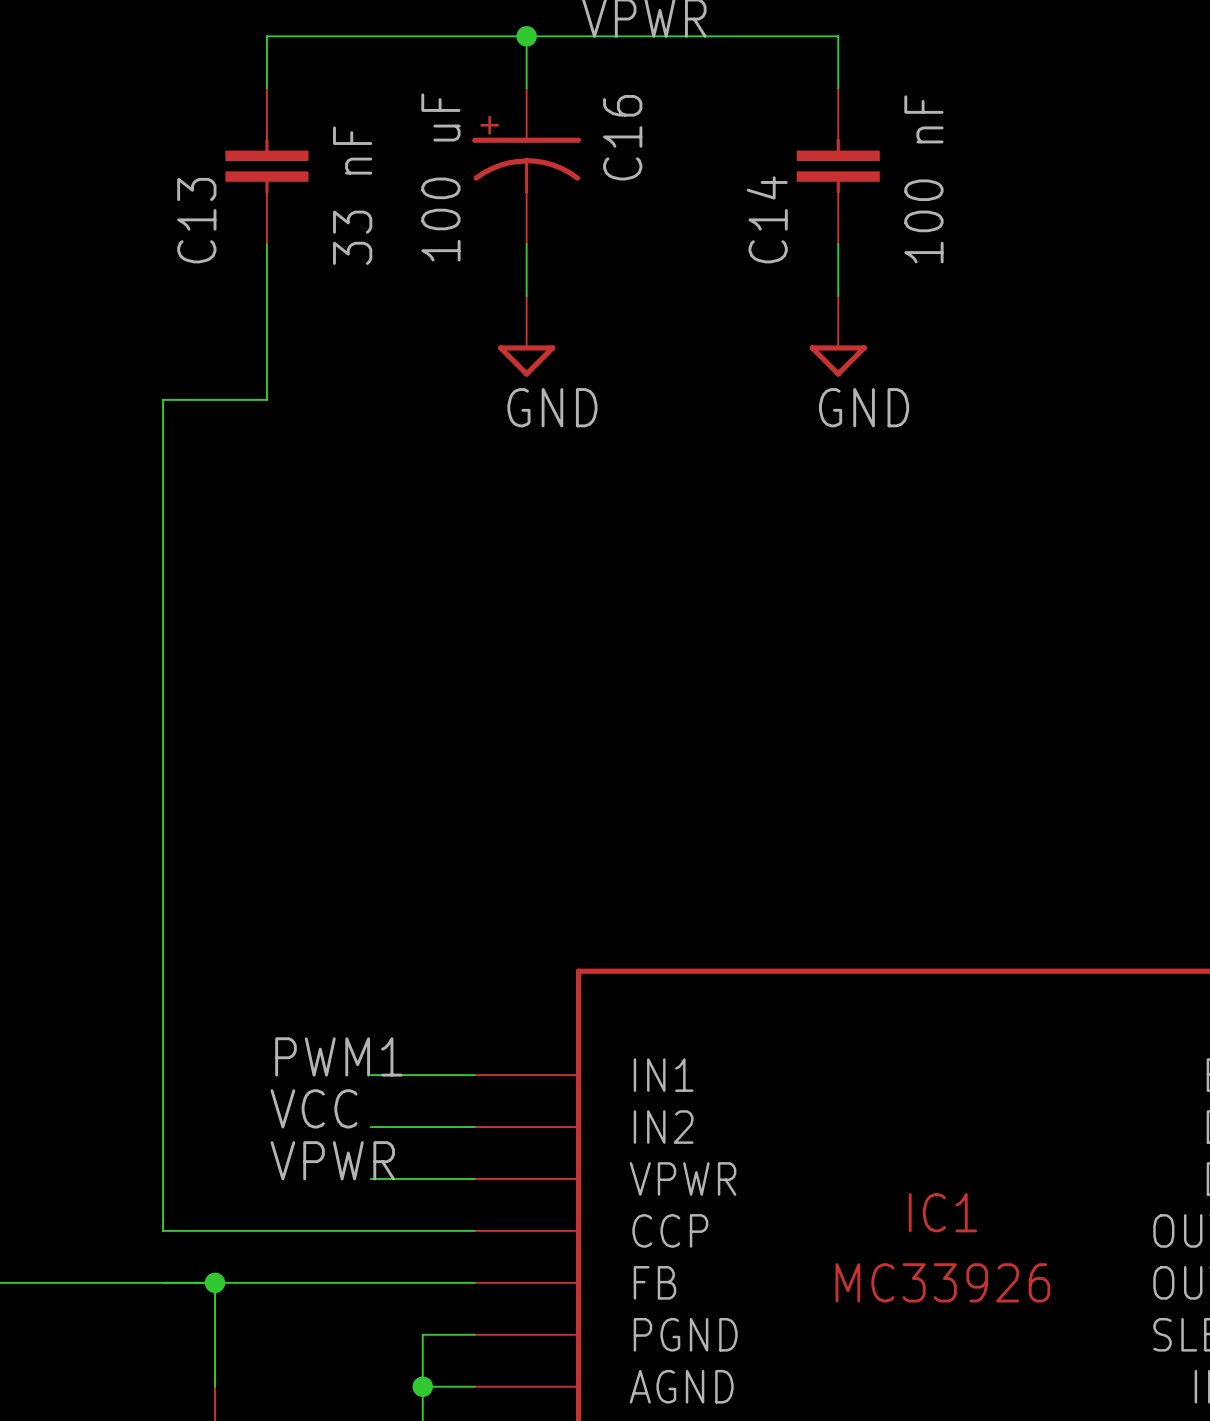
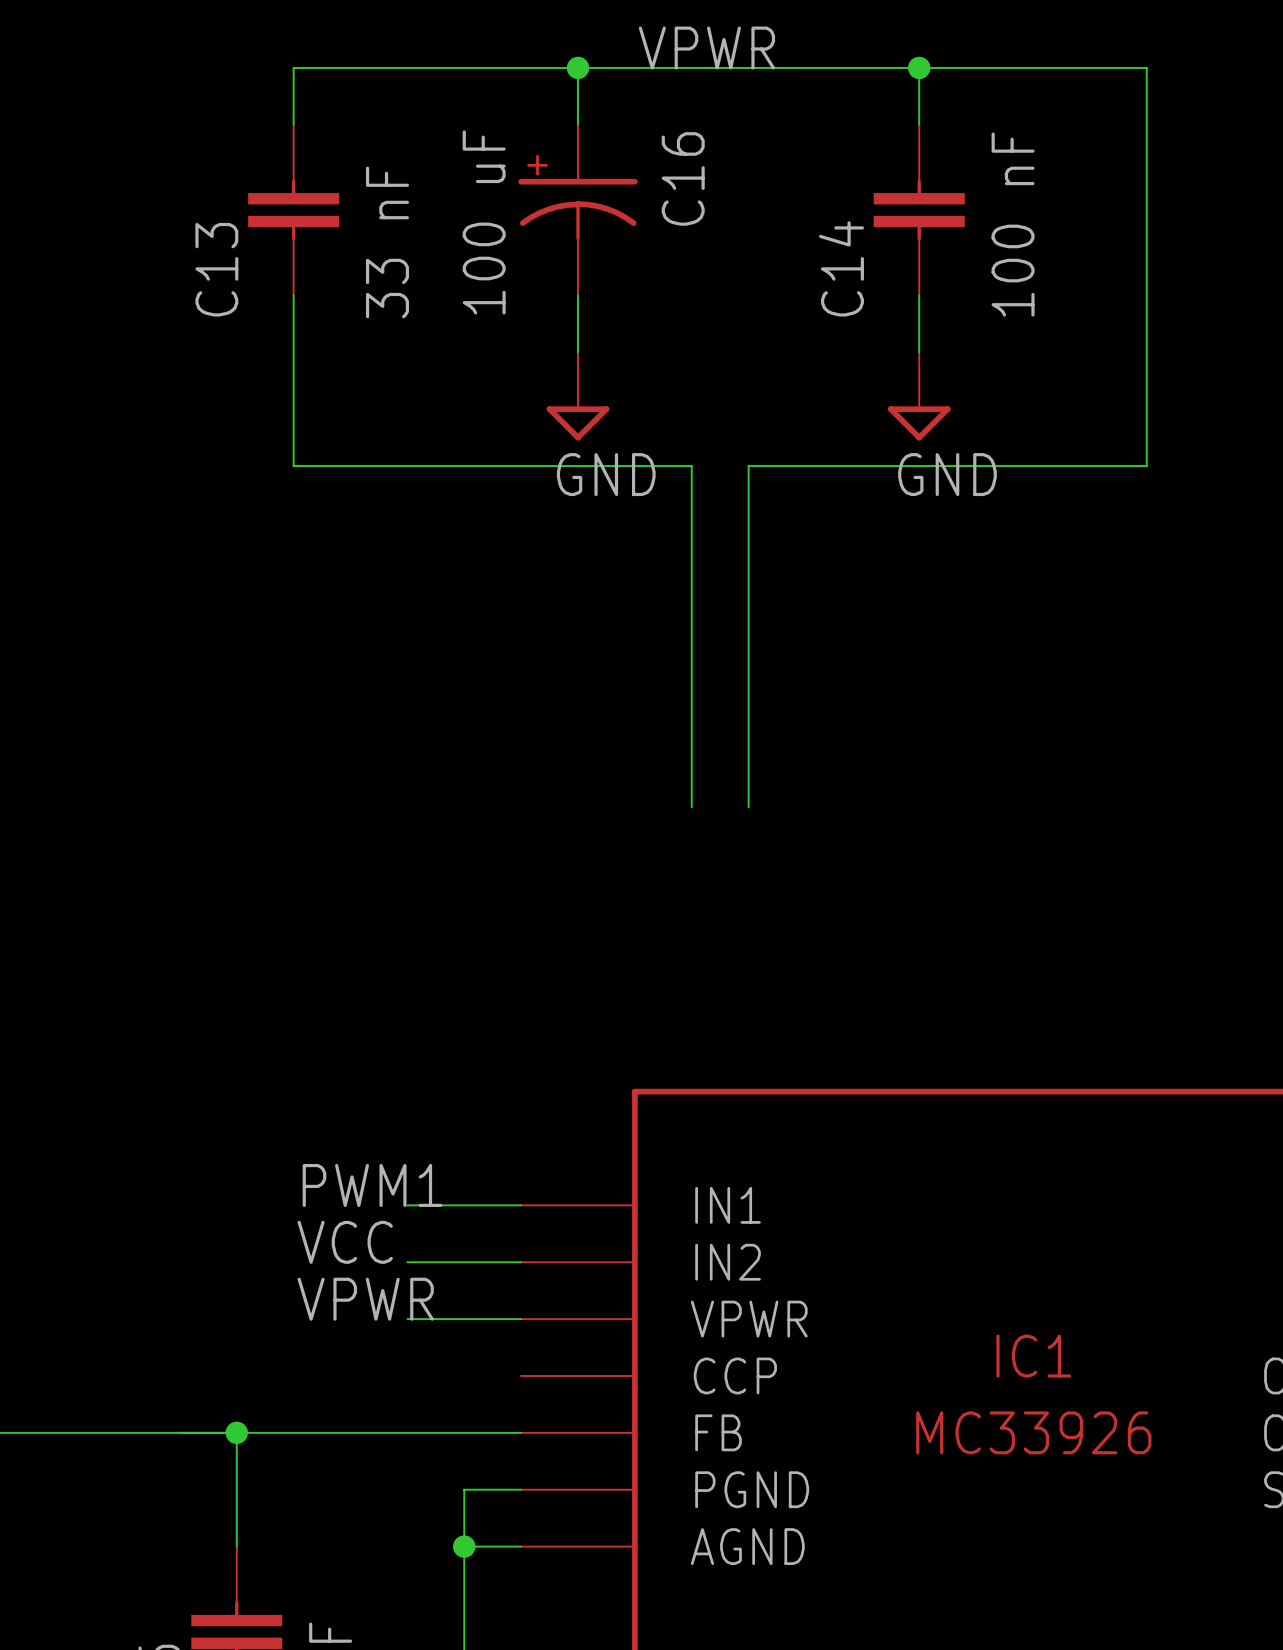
wire: none -> (919, 67) (1146, 67) (1146, 466) (748, 466) (748, 807)
junction: none -> (919, 67)
wire: (266, 399) (163, 399) (163, 1230) (474, 1230) -> (293, 466) (691, 466) (691, 807)

